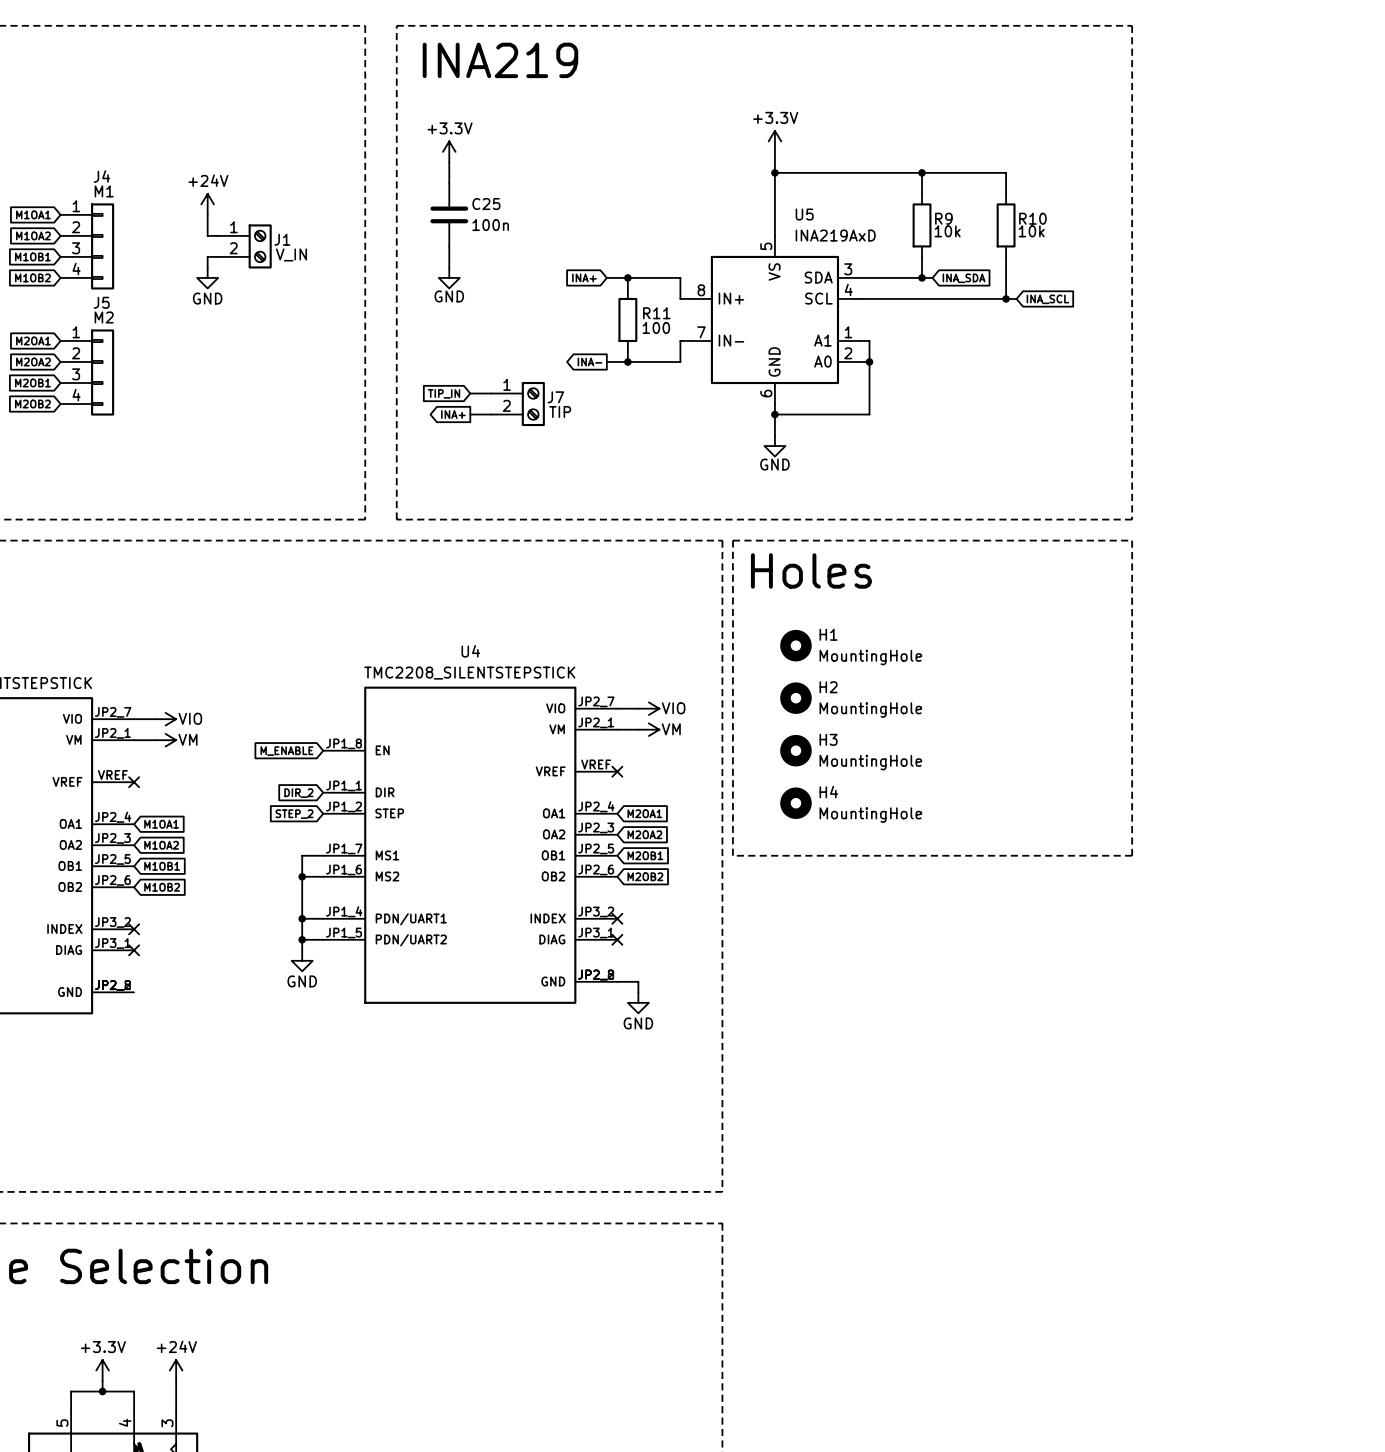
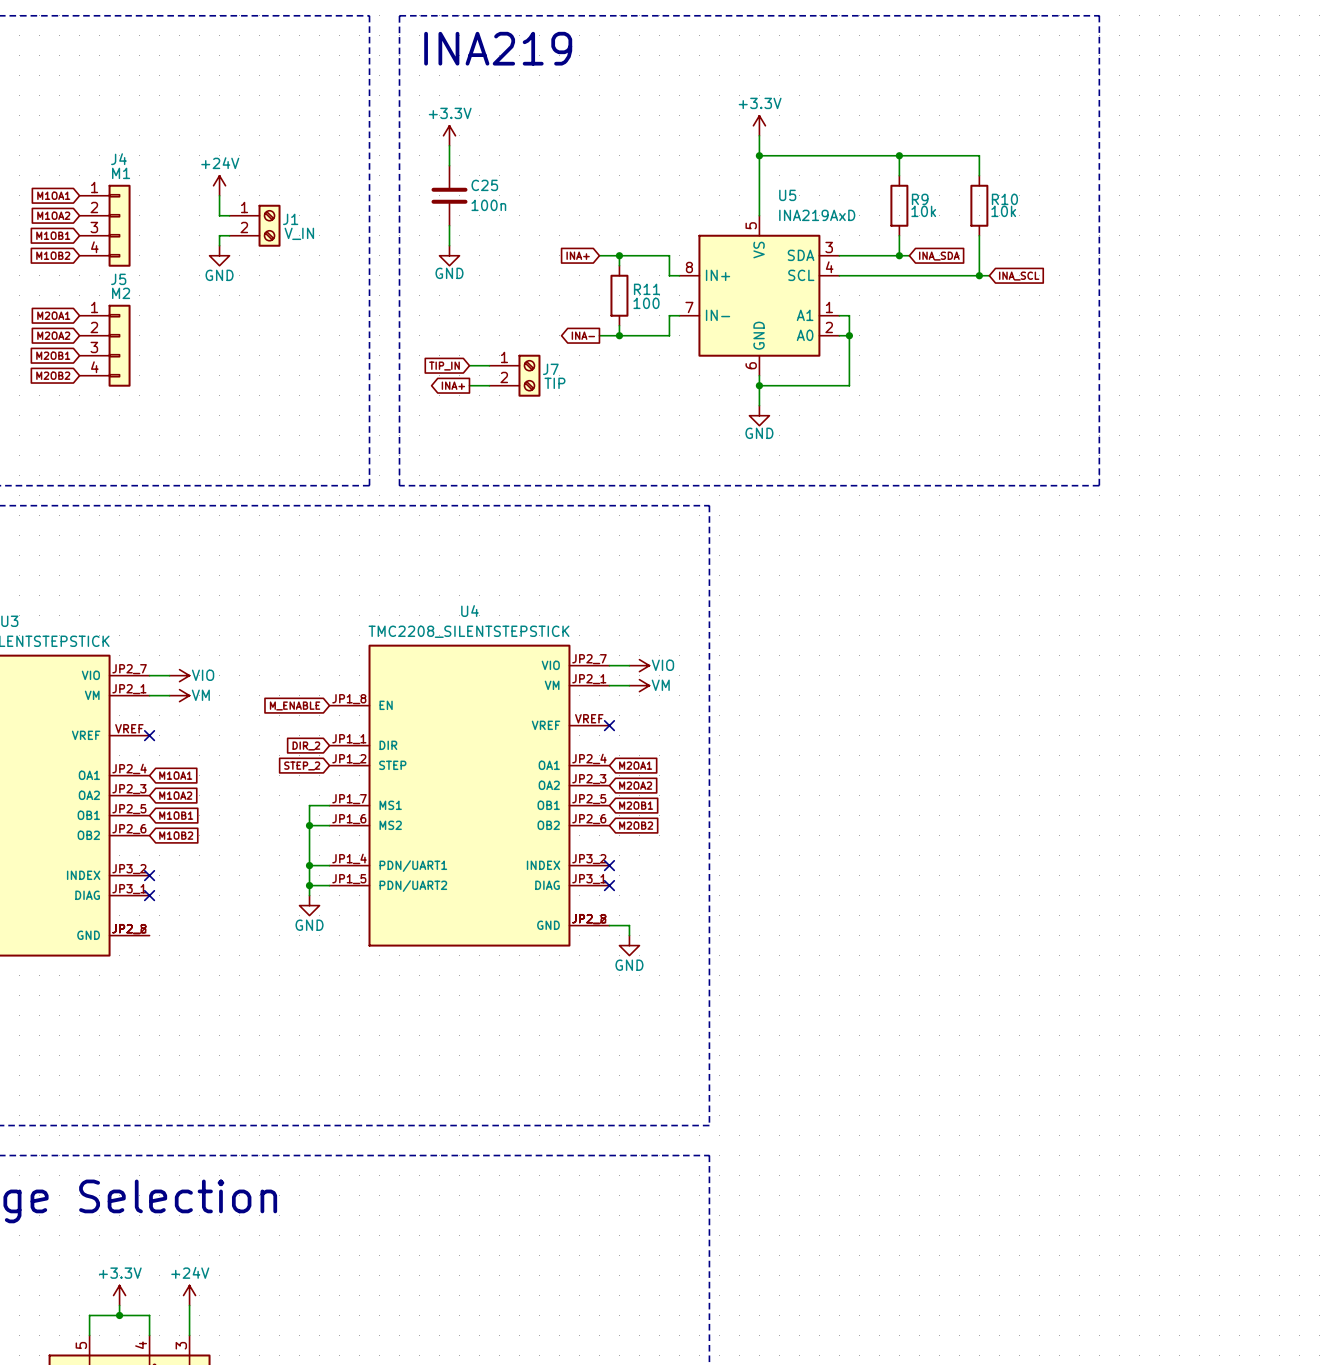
line: (732, 540) (1132, 540) (1132, 855) (732, 855) (732, 540) -> none
text: Holes (811, 570) -> none
H1: MountingHole (795, 645) -> none
H2: MountingHole (795, 698) -> none
H3: MountingHole (795, 750) -> none
H4: MountingHole (795, 803) -> none

